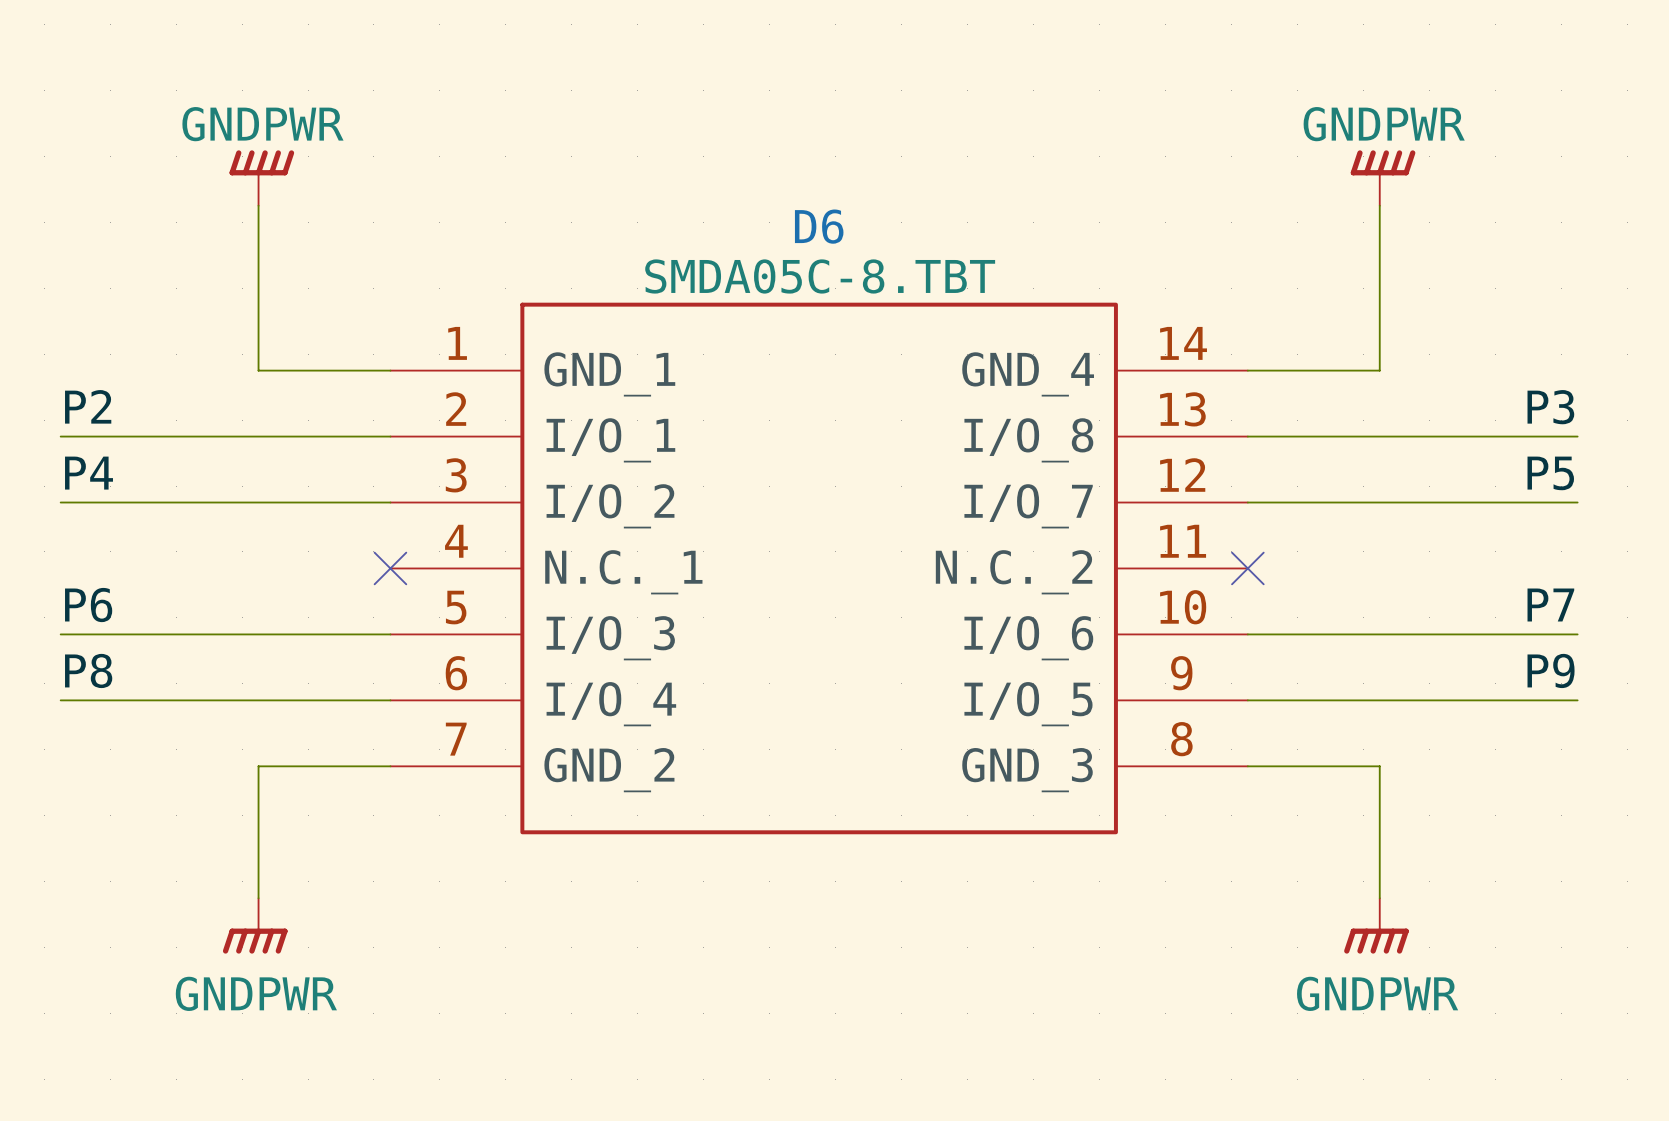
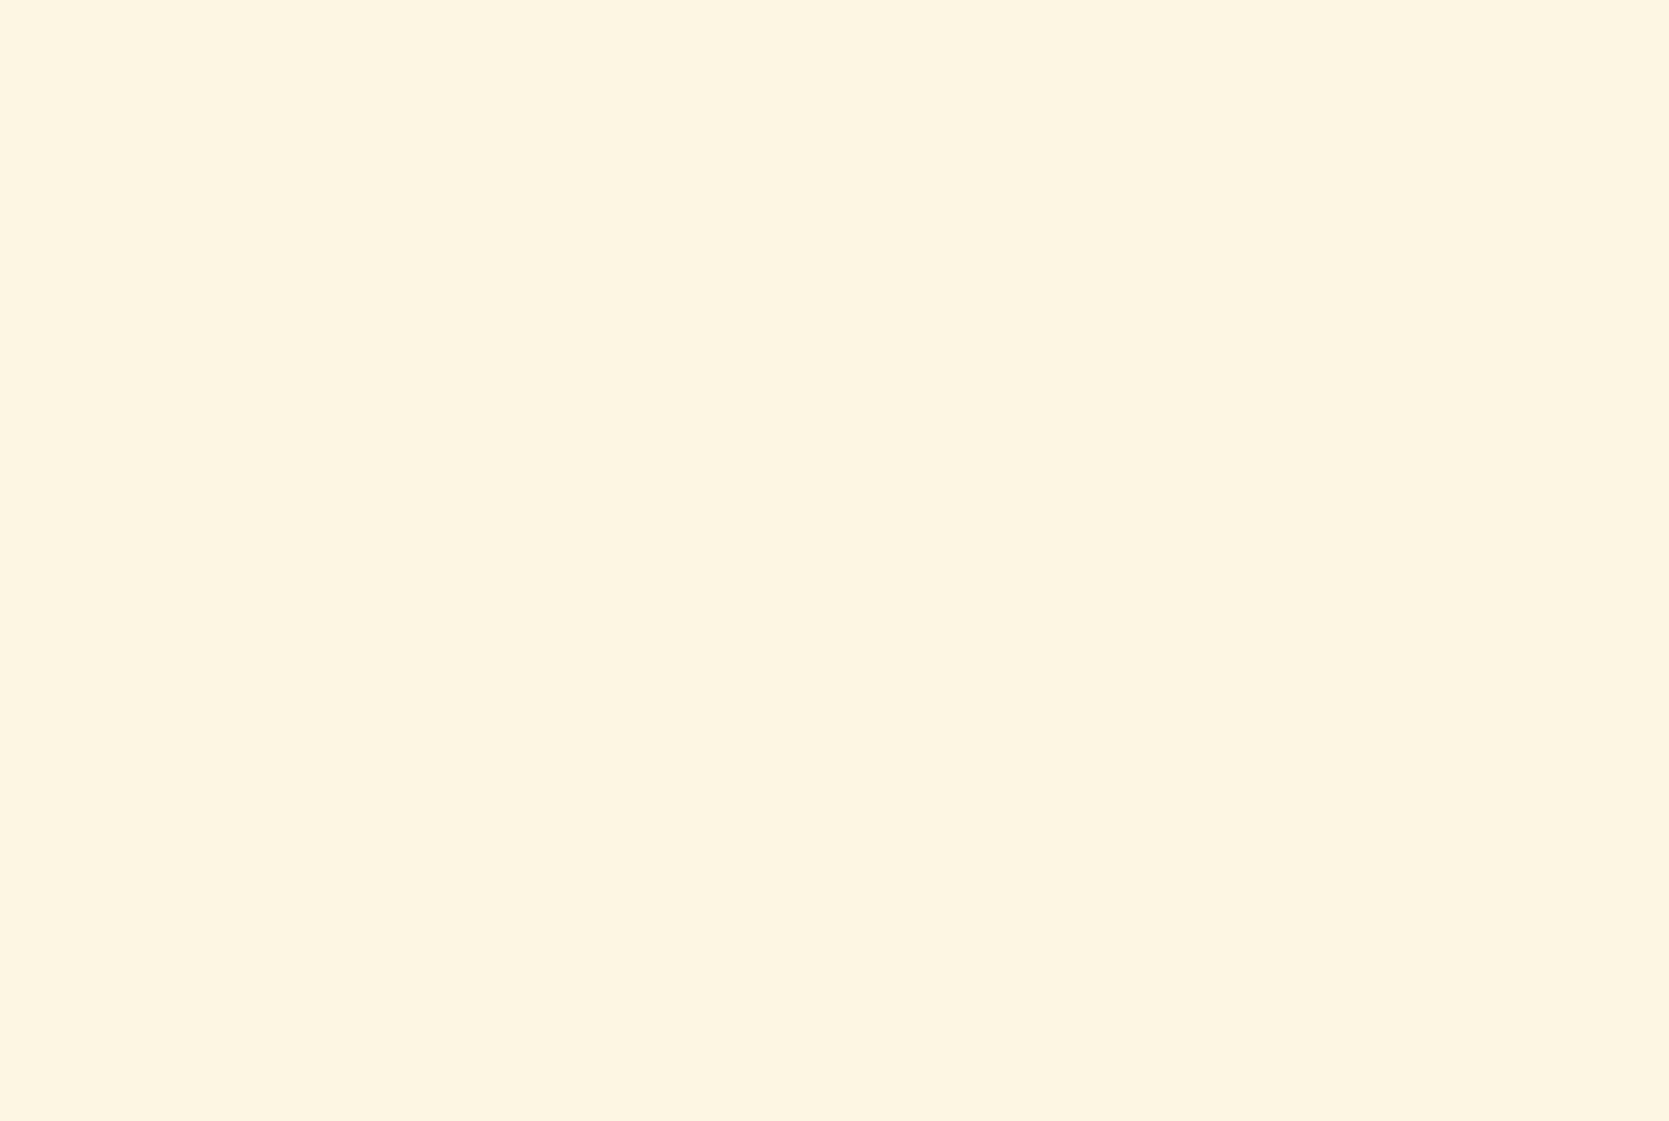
power symbol: GNDPWR (261, 178) -> none
power symbol: GNDPWR (1383, 178) -> none
wire: (258, 205) (258, 370) (390, 370) -> none
wire: (1379, 205) (1379, 370) (1247, 370) -> none
label: P2 (88, 406) -> none
label: P3 (1550, 407) -> none
wire: (60, 436) (390, 436) -> none
wire: (1247, 436) (1577, 436) -> none
label: P4 (89, 473) -> none
label: P5 (1550, 473) -> none
wire: (60, 502) (390, 502) -> none
wire: (1247, 502) (1577, 502) -> none
no-connect mark: (390, 568) -> none
D6: SMDA05C-8.TBT (819, 568) -> none
no-connect mark: (1247, 568) -> none
label: P7 (1550, 604) -> none
label: P6 (88, 605) -> none
wire: (60, 634) (390, 634) -> none
wire: (1247, 634) (1577, 634) -> none
label: P8 (88, 670) -> none
label: P9 (1551, 670) -> none
wire: (60, 700) (390, 700) -> none
wire: (1247, 700) (1577, 700) -> none
wire: (390, 766) (258, 766) (258, 898) -> none
wire: (1247, 766) (1379, 766) (1379, 898) -> none
power symbol: GNDPWR (255, 925) -> none
power symbol: GNDPWR (1376, 925) -> none

